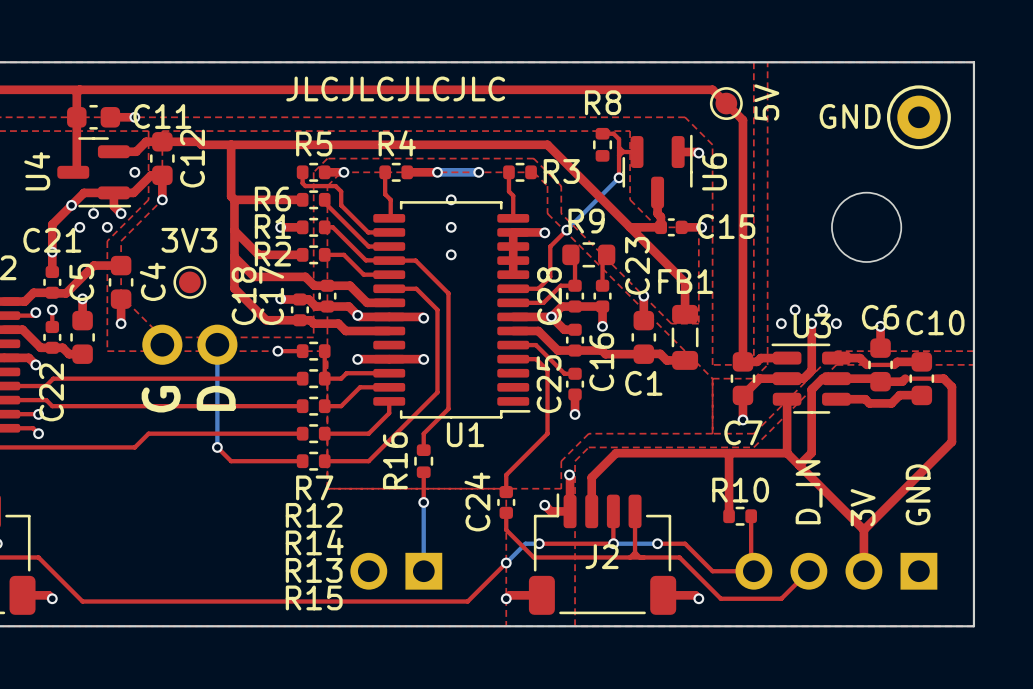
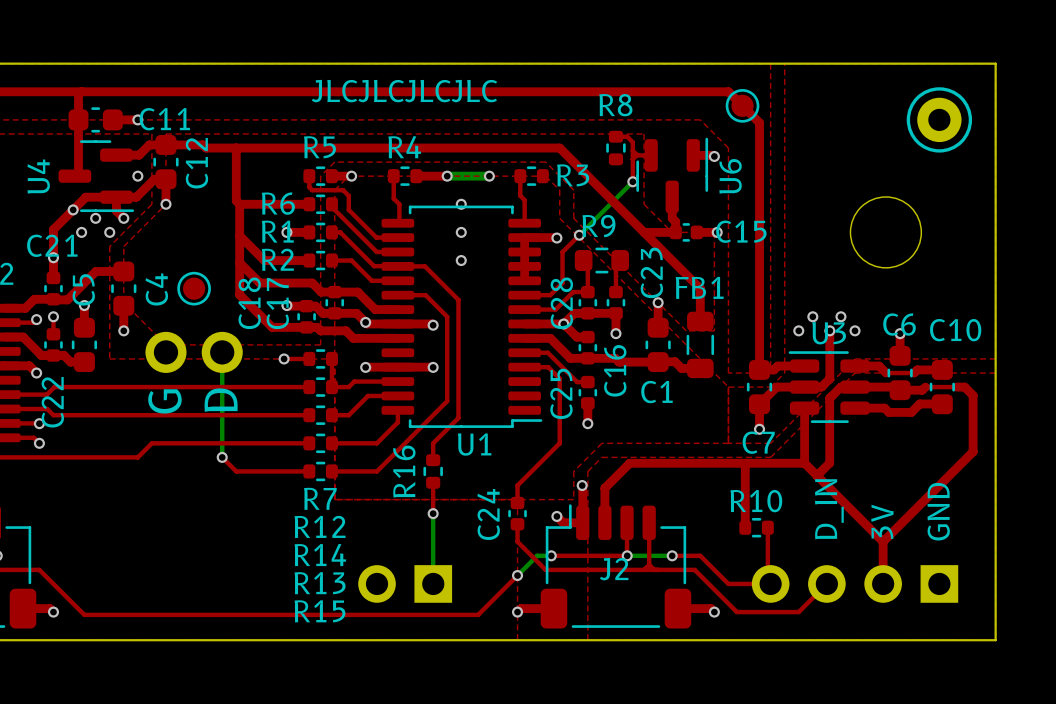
part value: 5V (766, 102) -> none
part value: GND (850, 116) -> none
part value: 3V3 (189, 240) -> none

